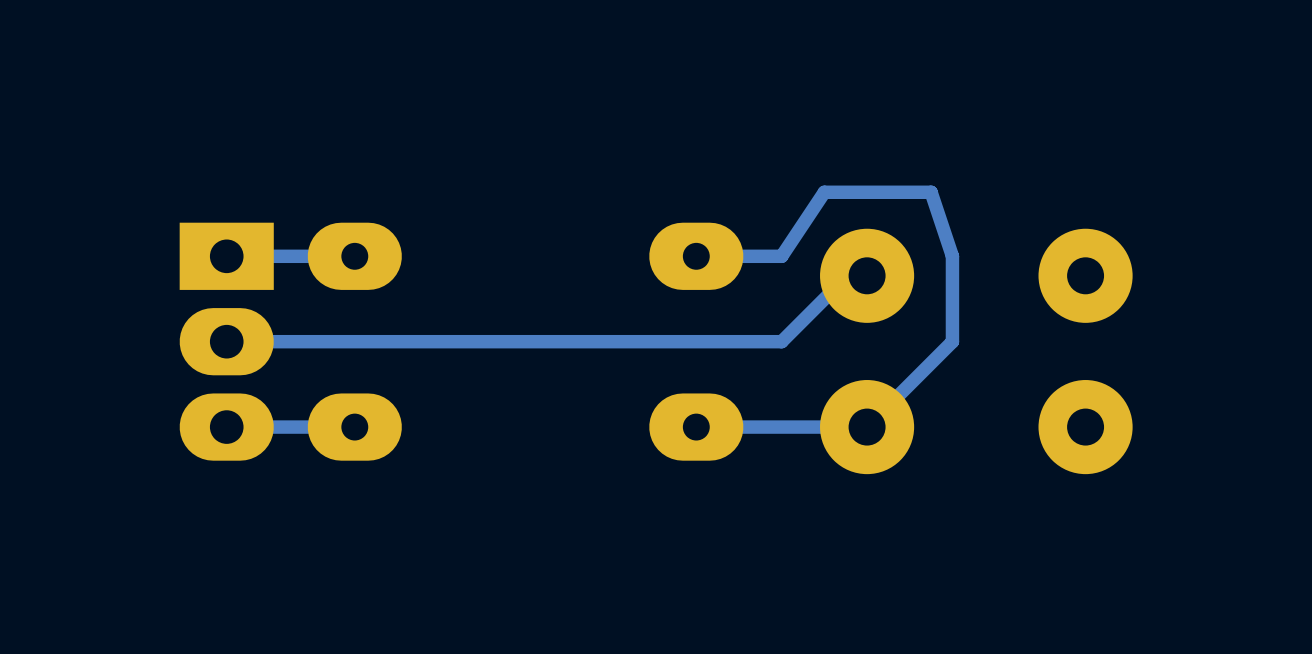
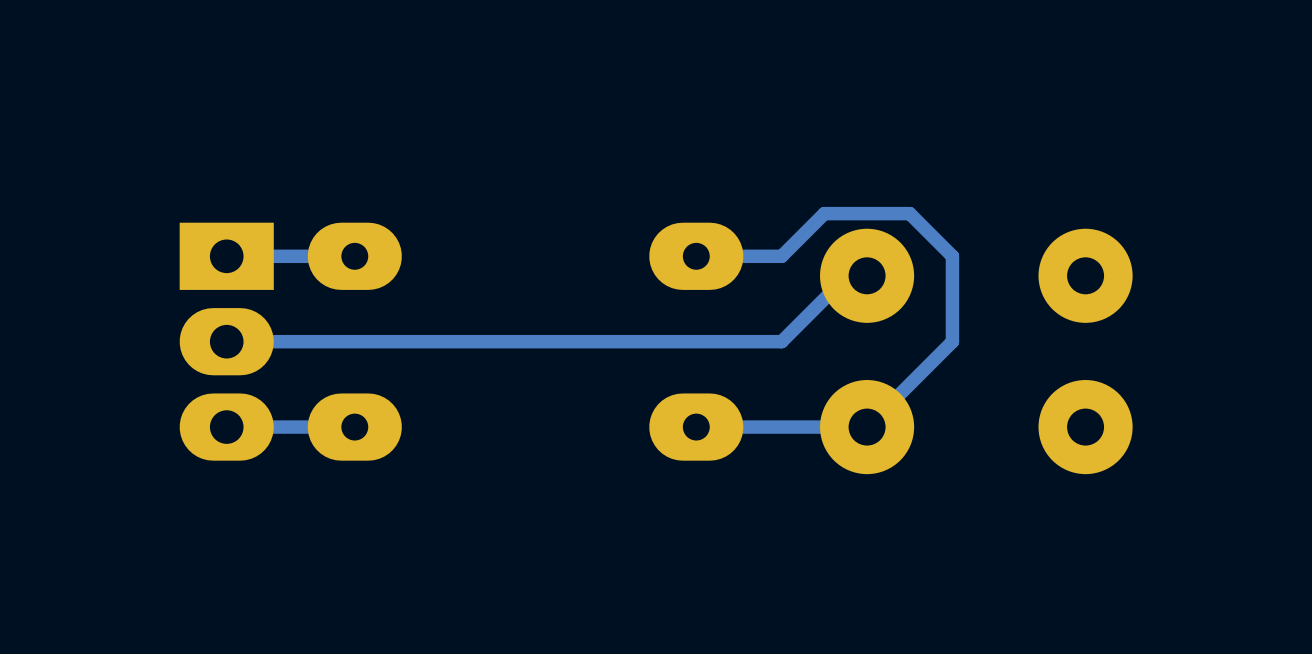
track: (952, 256) (931, 192) (824, 192) (781, 256) -> (952, 256) (909, 213) (824, 213) (781, 256)

